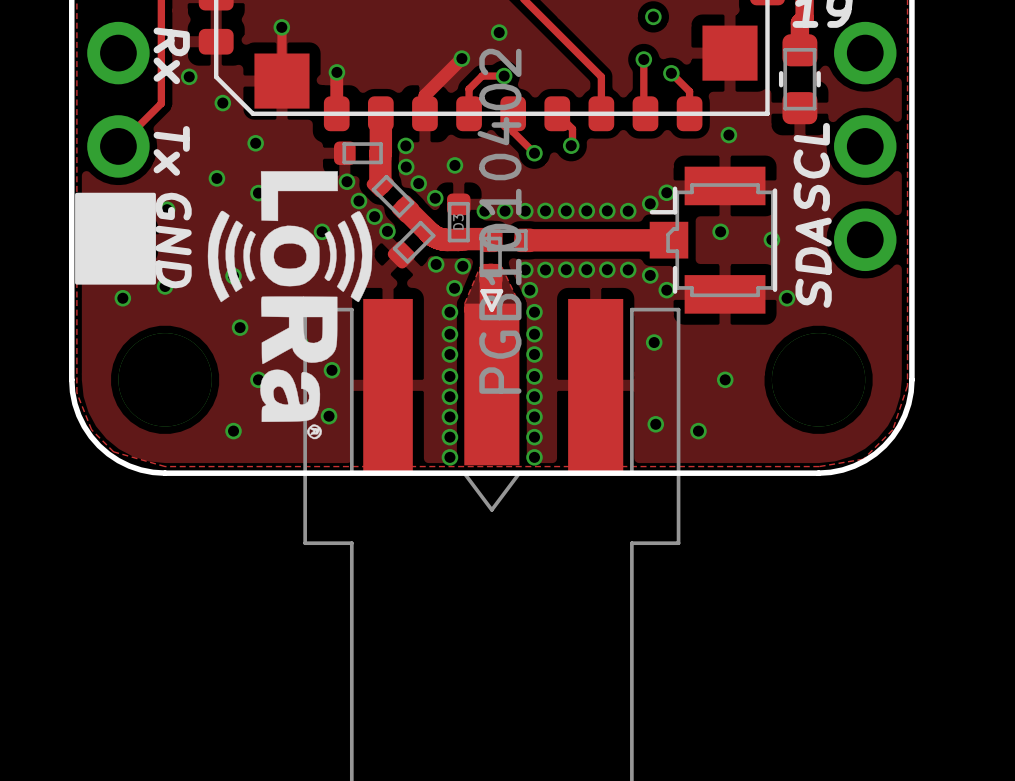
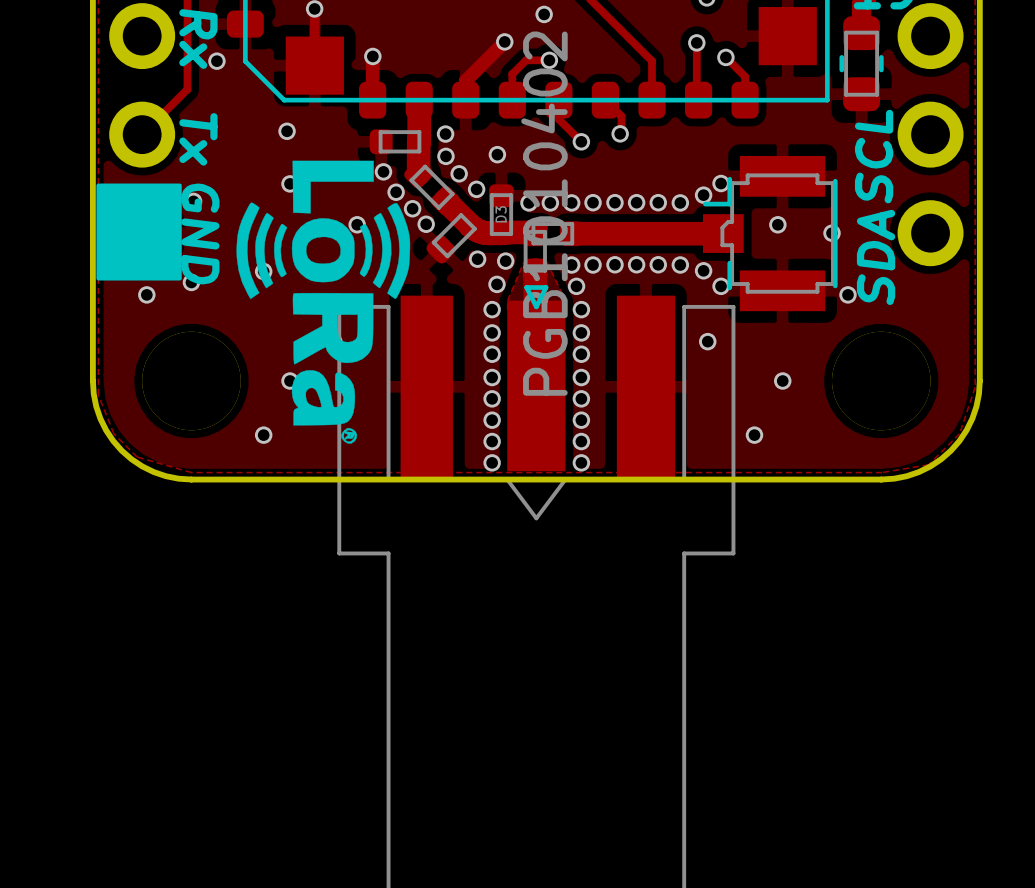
via: (222, 103) -> none
via: (728, 135) -> none
via: (216, 178) -> none
via: (240, 327) -> none
via: (331, 370) -> none
via: (329, 416) -> none
via: (655, 424) -> none

